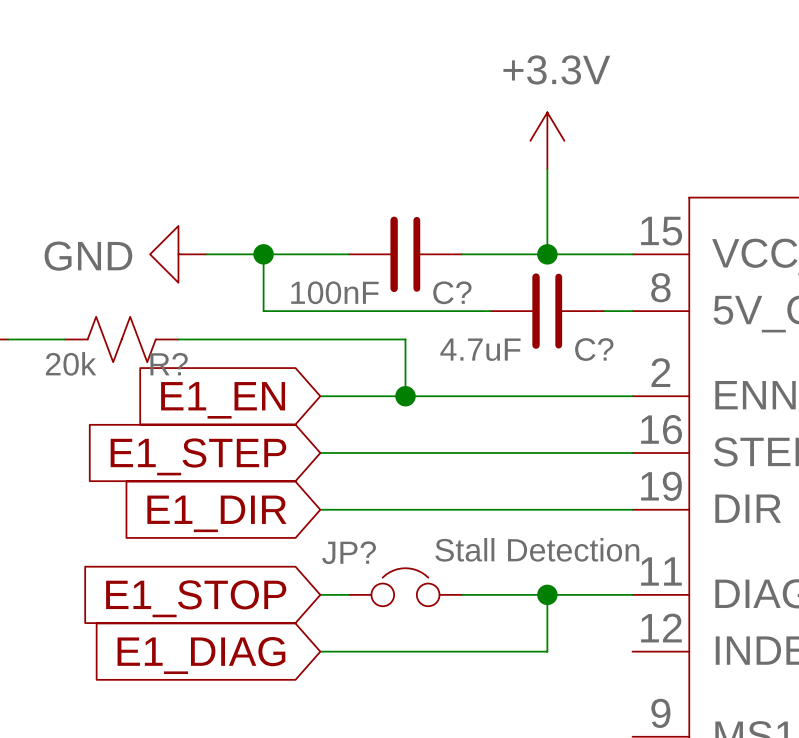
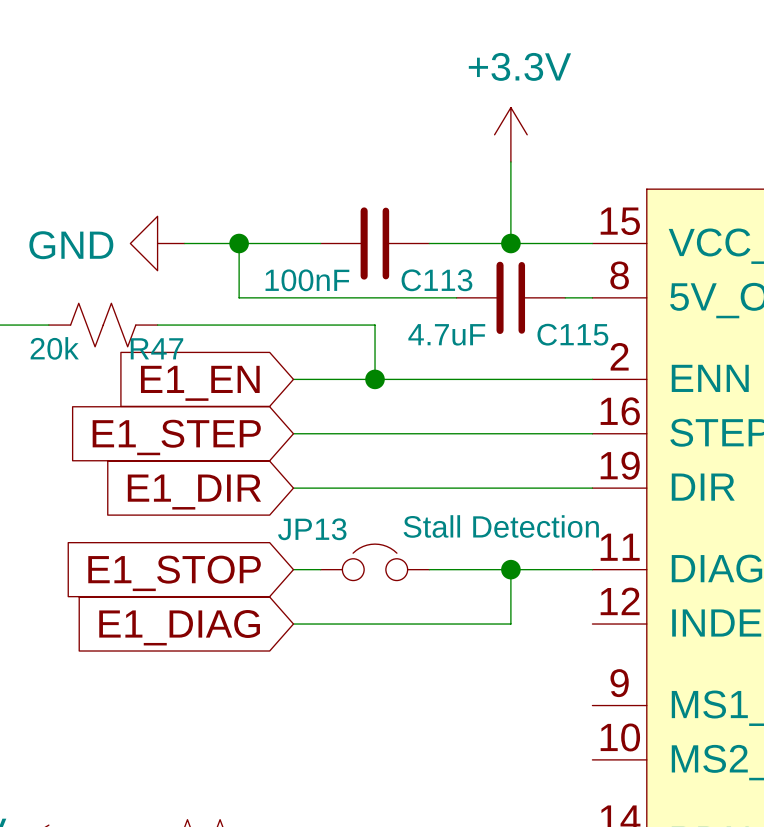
C? name: C? (452, 292) -> C113 (436, 280)
C? name: C? (594, 349) -> C115 (572, 334)
R? name: R? (169, 364) -> R47 (156, 348)
JP? name: JP? (349, 552) -> JP13 (312, 529)

